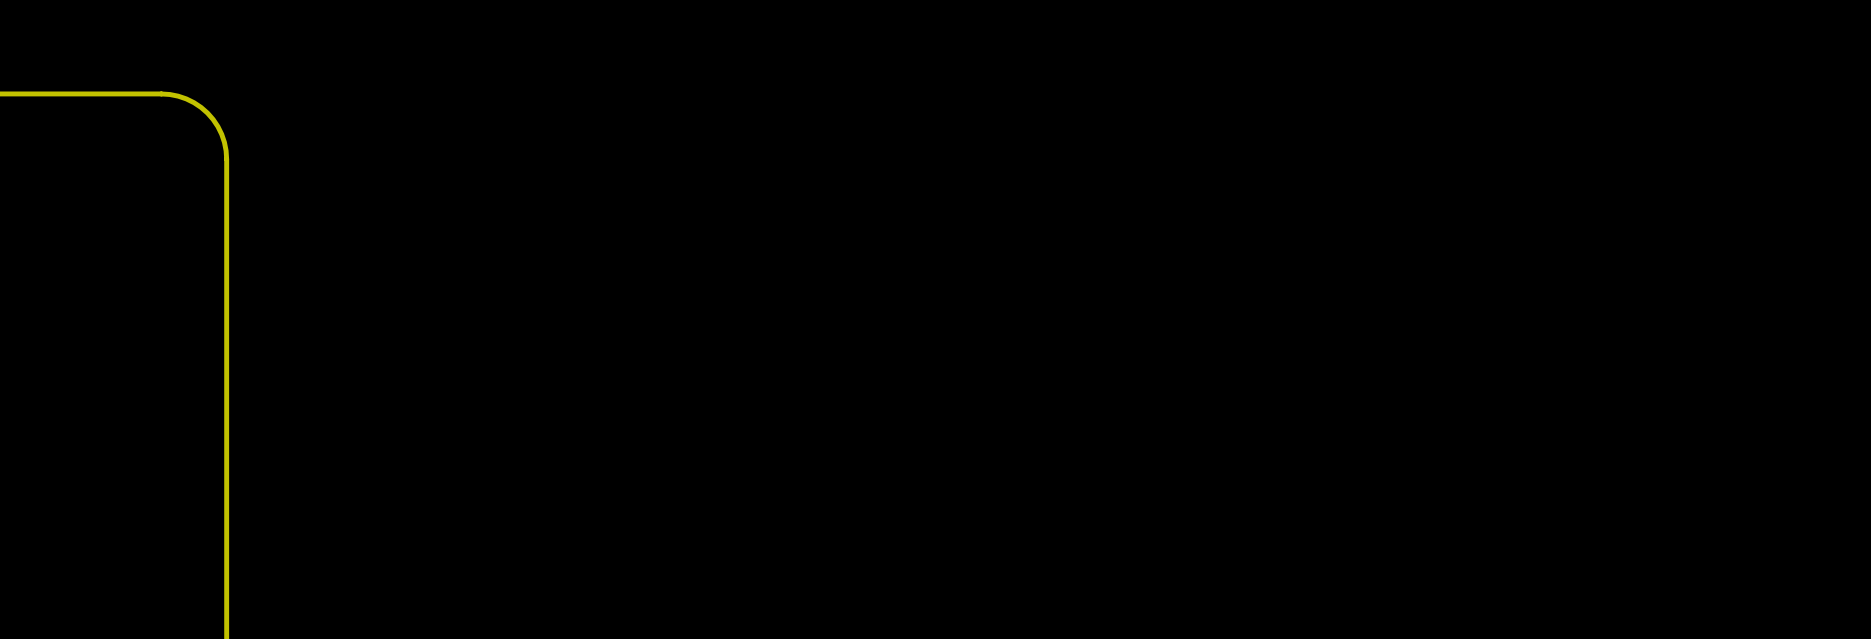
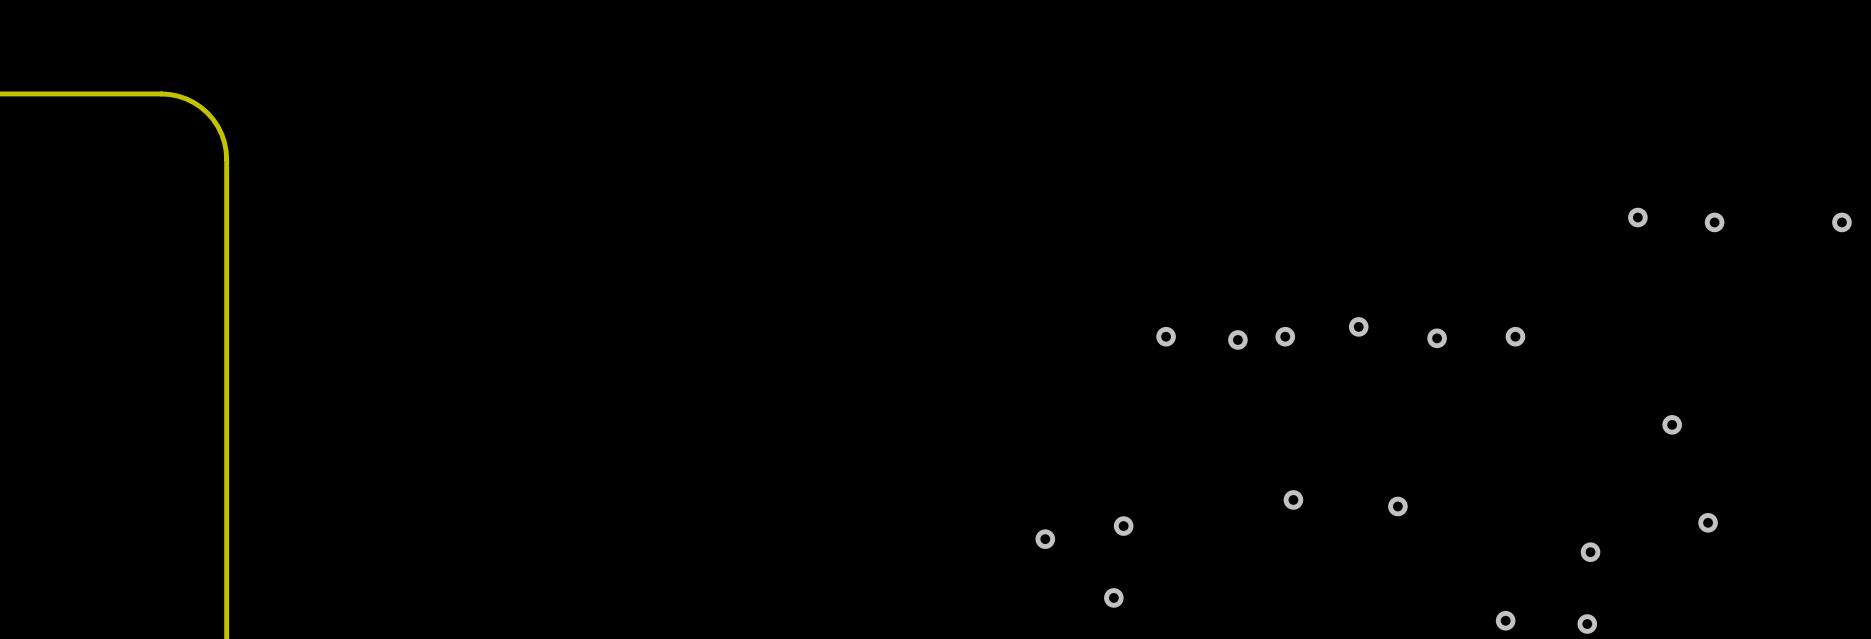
via: none -> (1637, 217)
via: none -> (1714, 222)
via: none -> (1841, 222)
via: none -> (1358, 326)
via: none -> (1166, 336)
via: none -> (1285, 336)
via: none -> (1515, 336)
via: none -> (1437, 338)
via: none -> (1237, 339)
via: none -> (1672, 424)
via: none -> (1293, 499)
via: none -> (1397, 506)
via: none -> (1708, 522)
via: none -> (1123, 526)
via: none -> (1045, 539)
via: none -> (1590, 552)
via: none -> (1113, 597)
via: none -> (1505, 620)
via: none -> (1587, 624)

